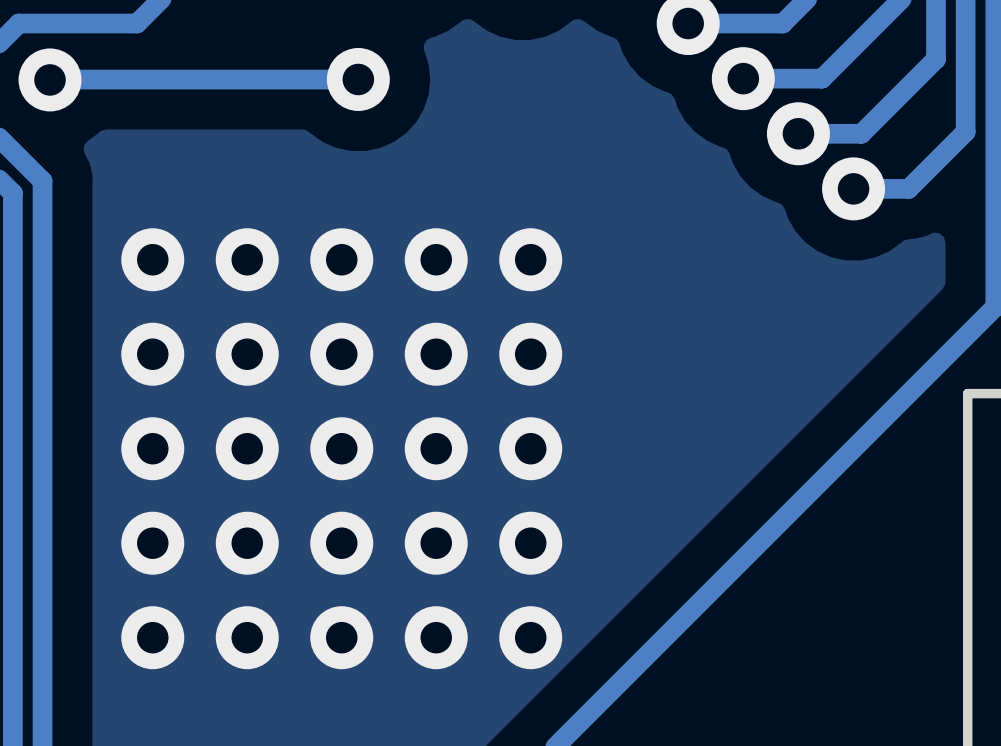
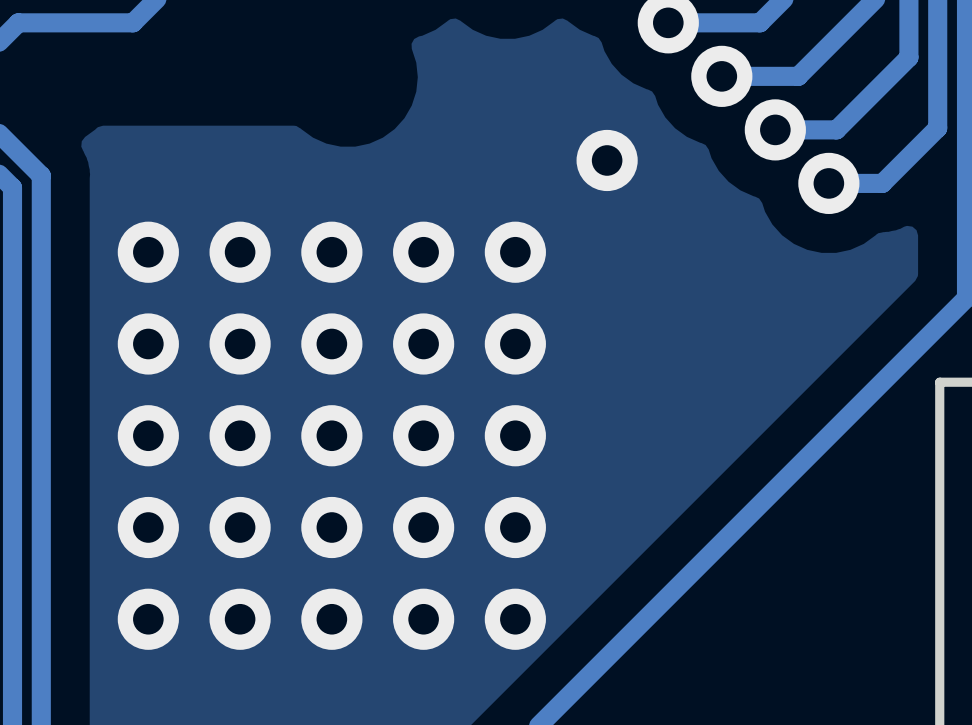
via: (50, 79) -> none
track: (358, 79) (50, 79) -> none
via: (358, 79) -> none
via: none -> (607, 160)

